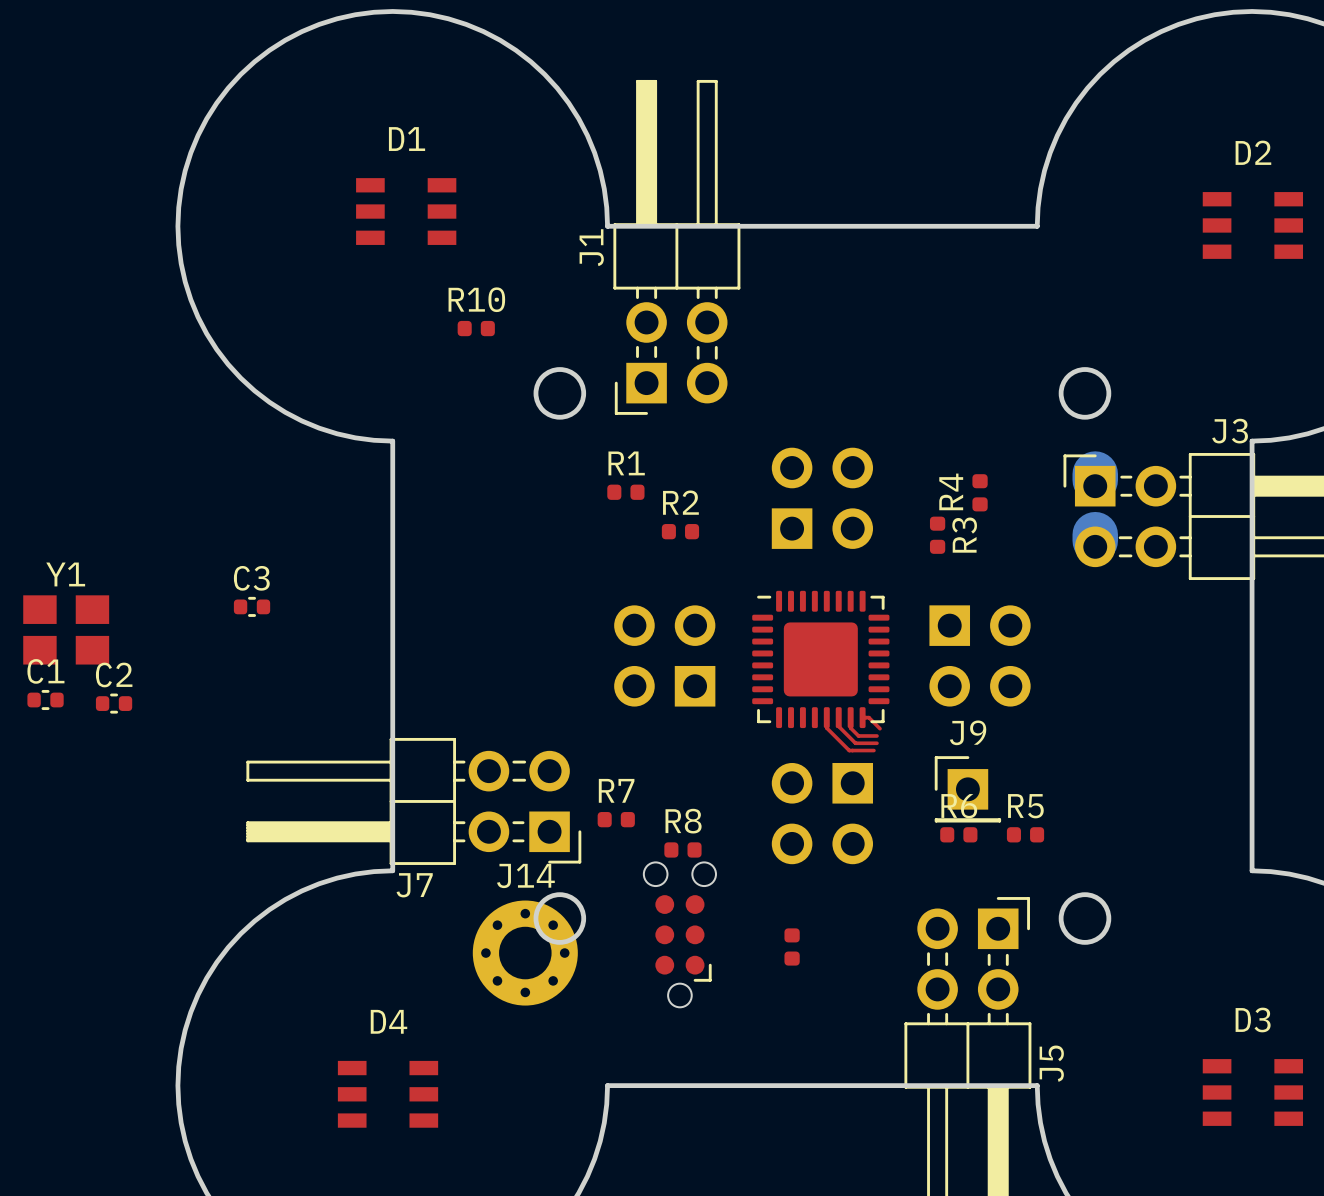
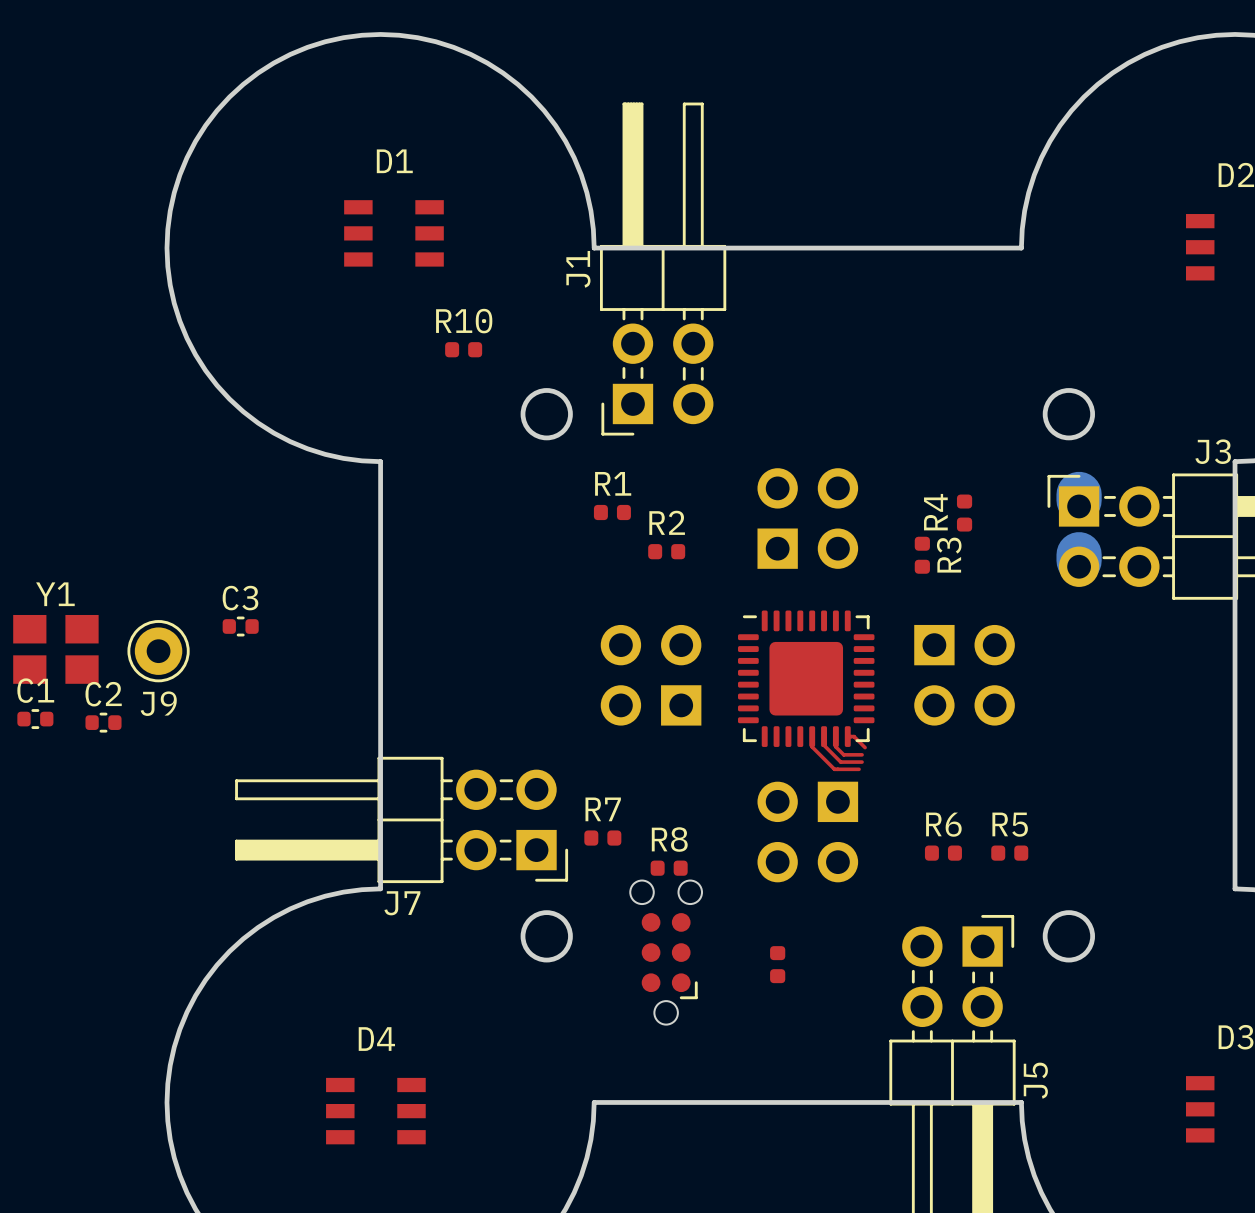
J9 name position: J9 (968, 732) -> J9 (158, 703)
J9 footprint: [934, 756, 1002, 823] -> [127, 620, 190, 683]
J14: (525, 953) -> none

